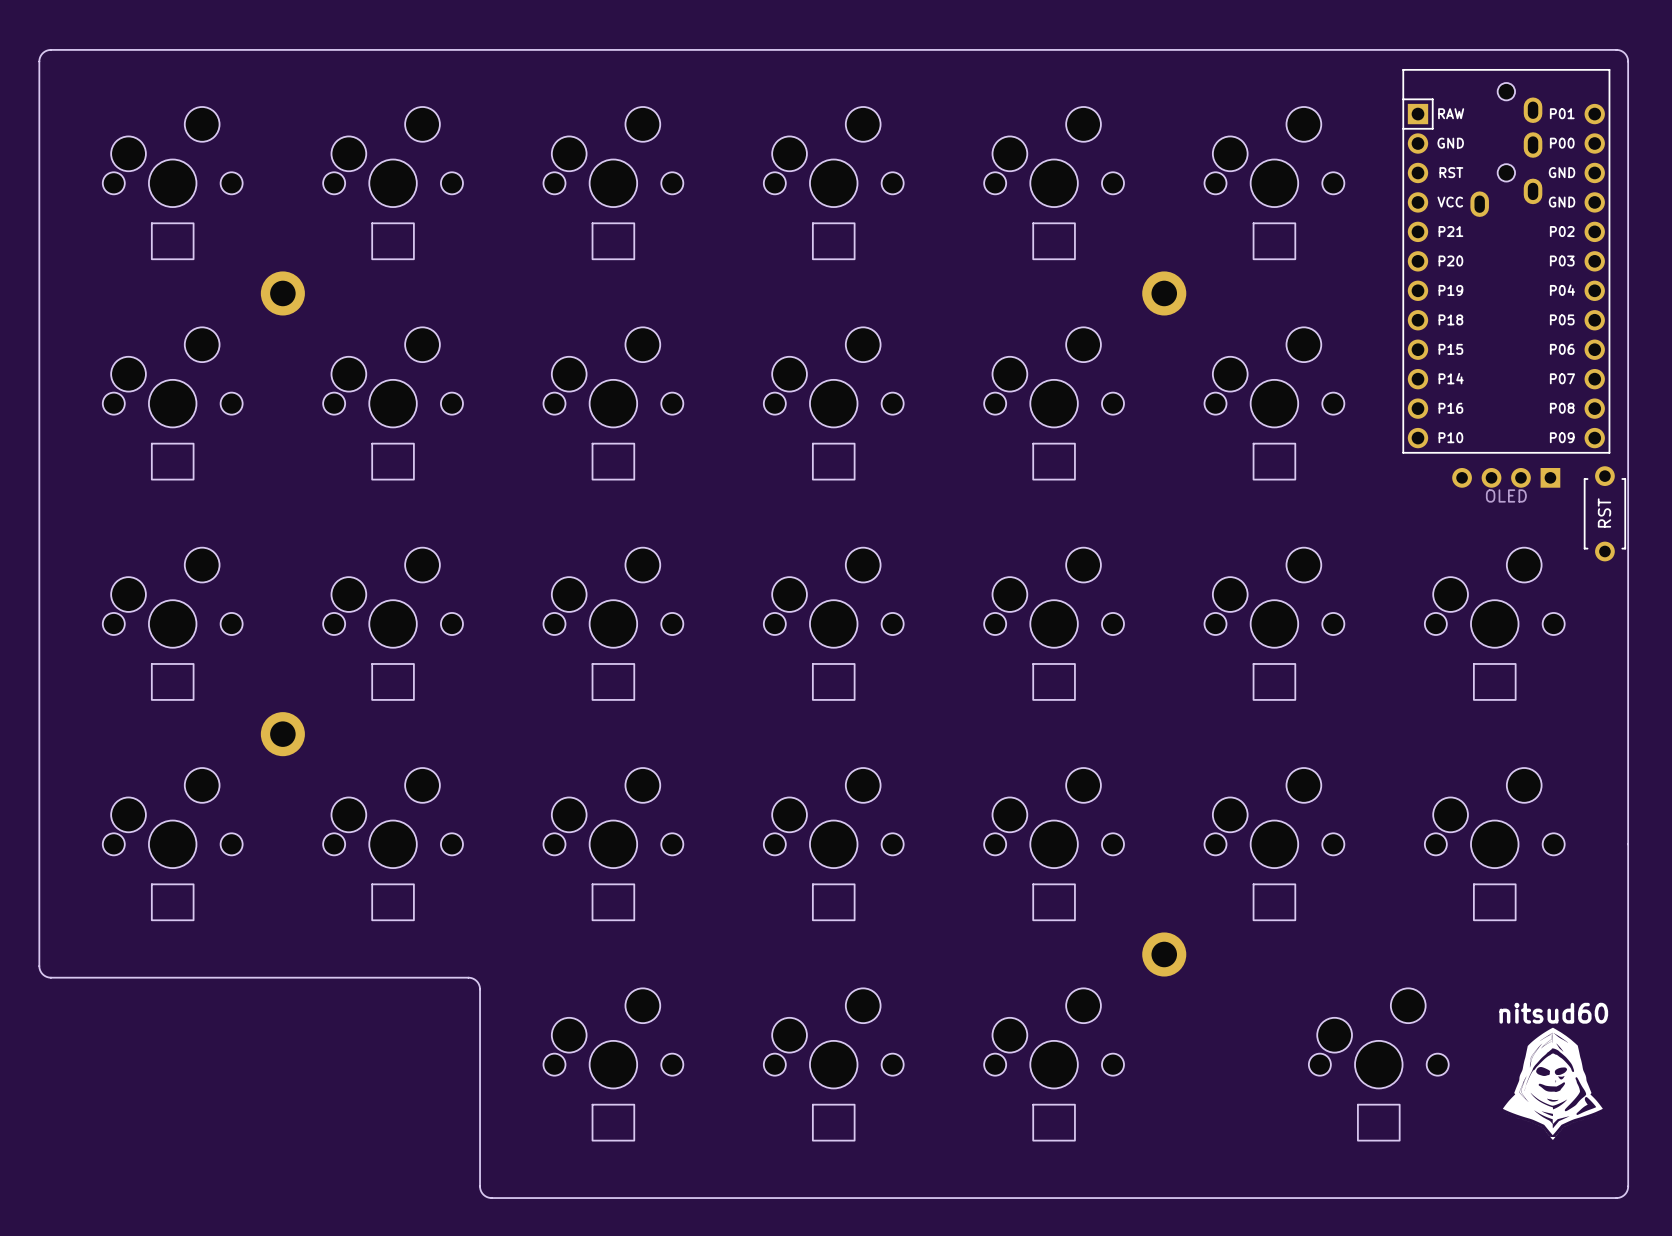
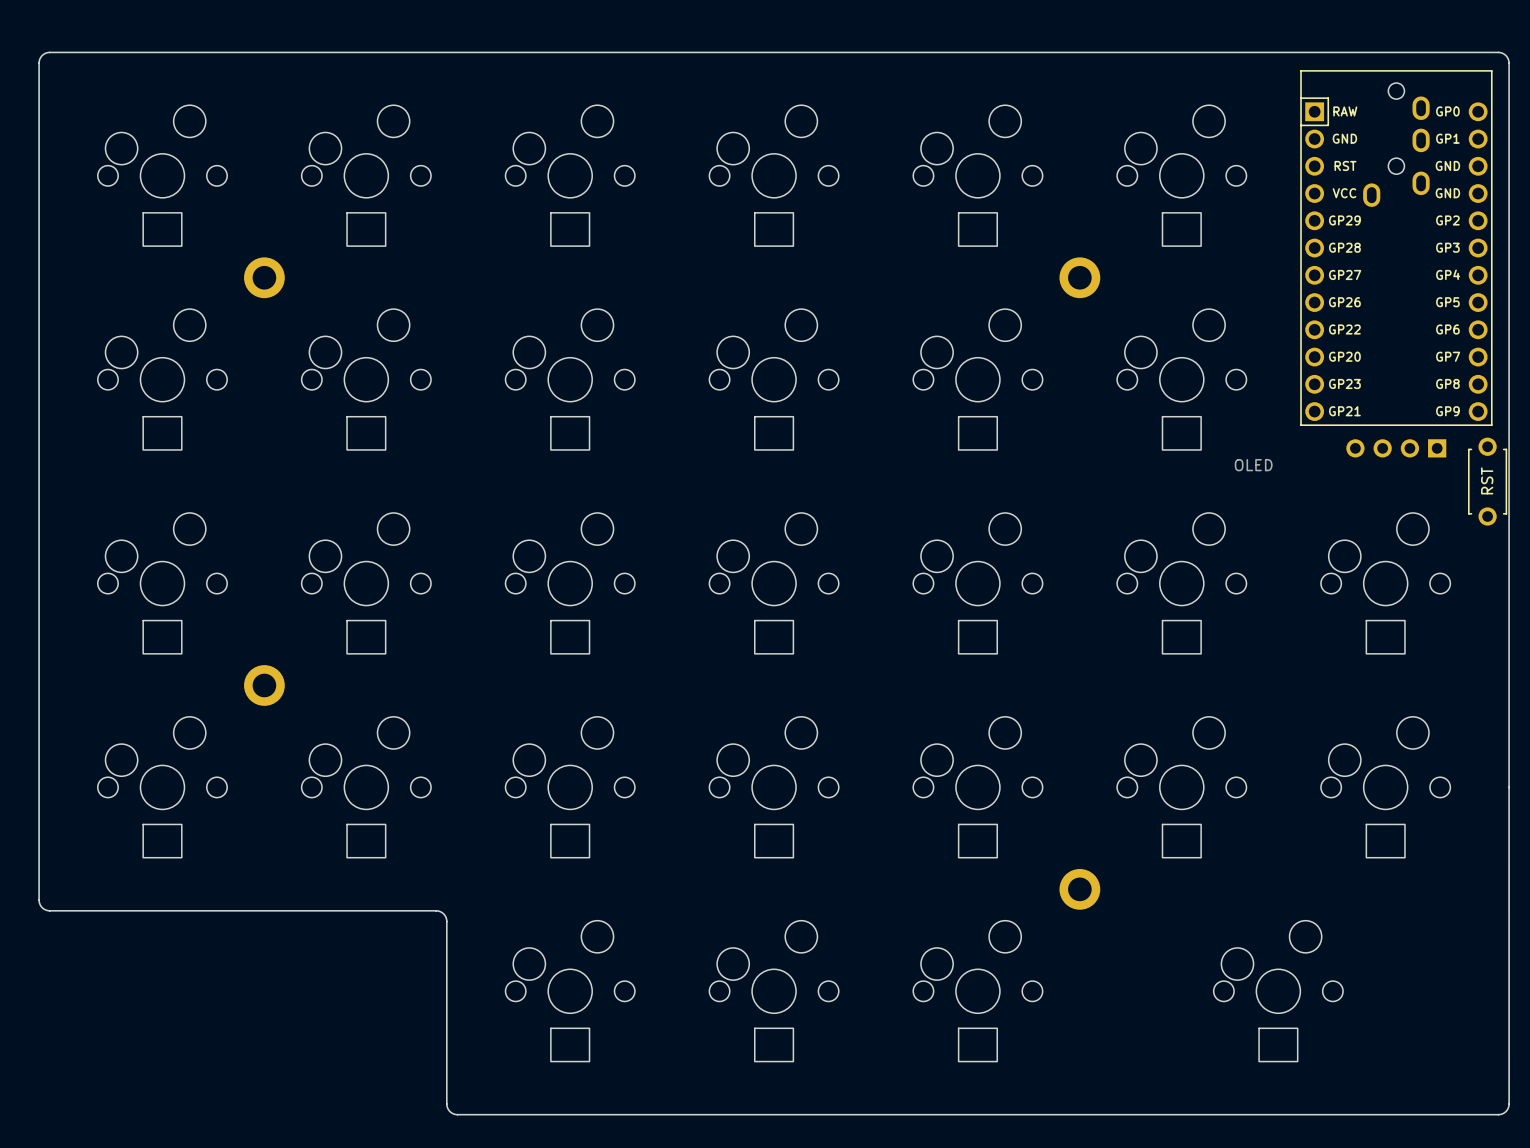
part footprint: [1402, 69, 1611, 454] -> [1300, 70, 1493, 426]
part value position: OLED (1506, 495) -> OLED (1253, 465)
text: nitsud60 (1553, 1013) -> none
drawing: [1502, 1027, 1603, 1140] -> none

